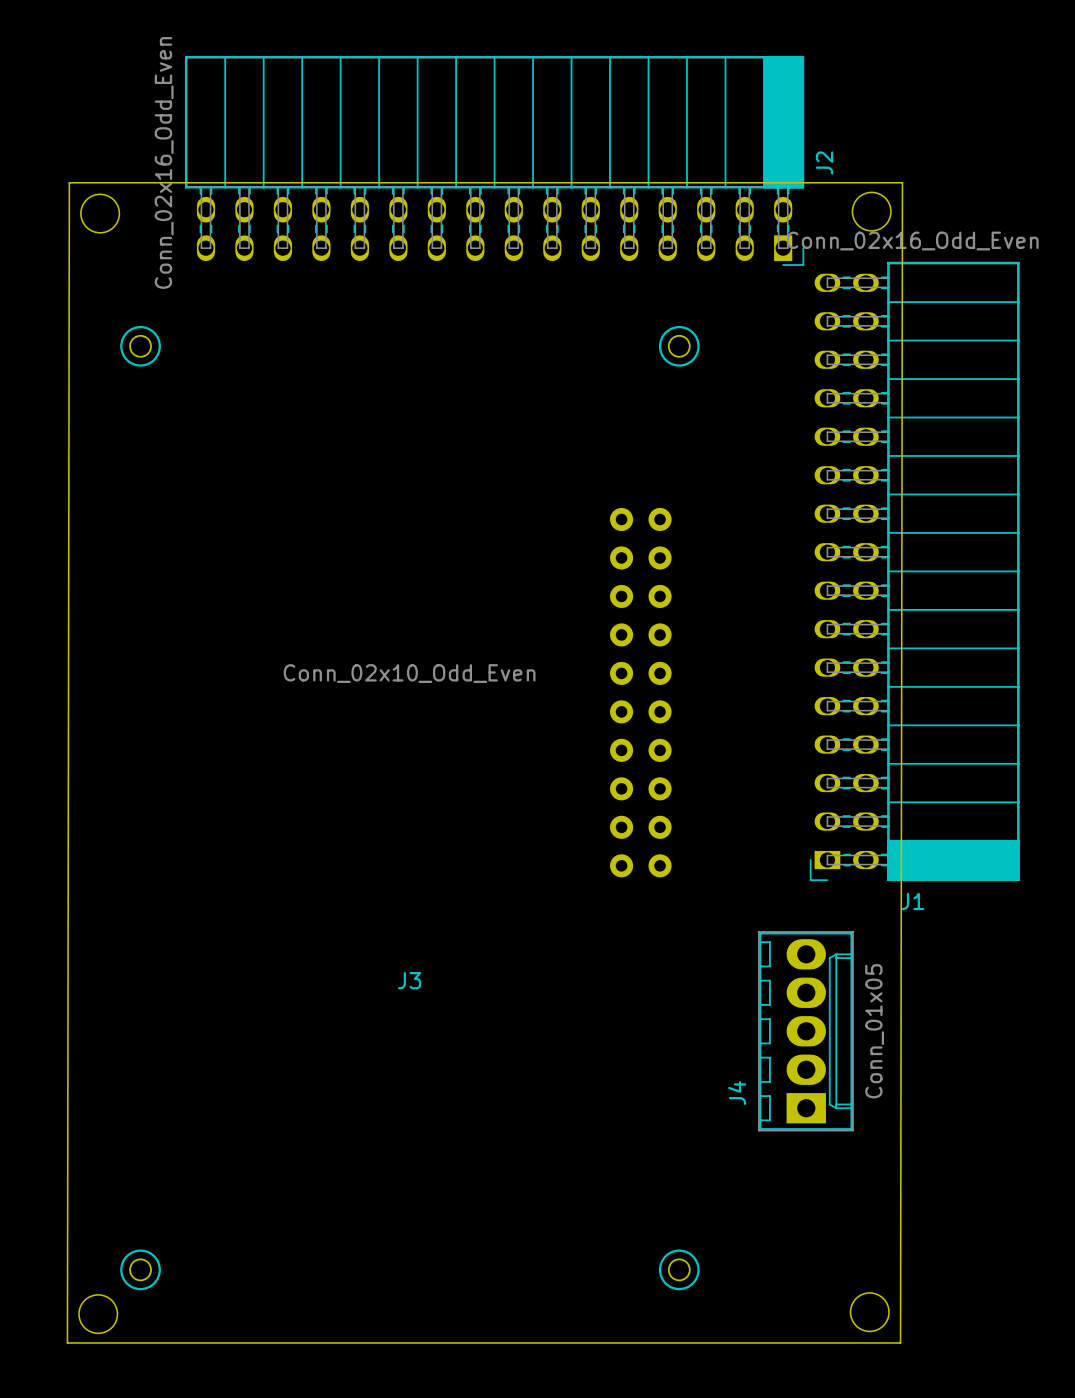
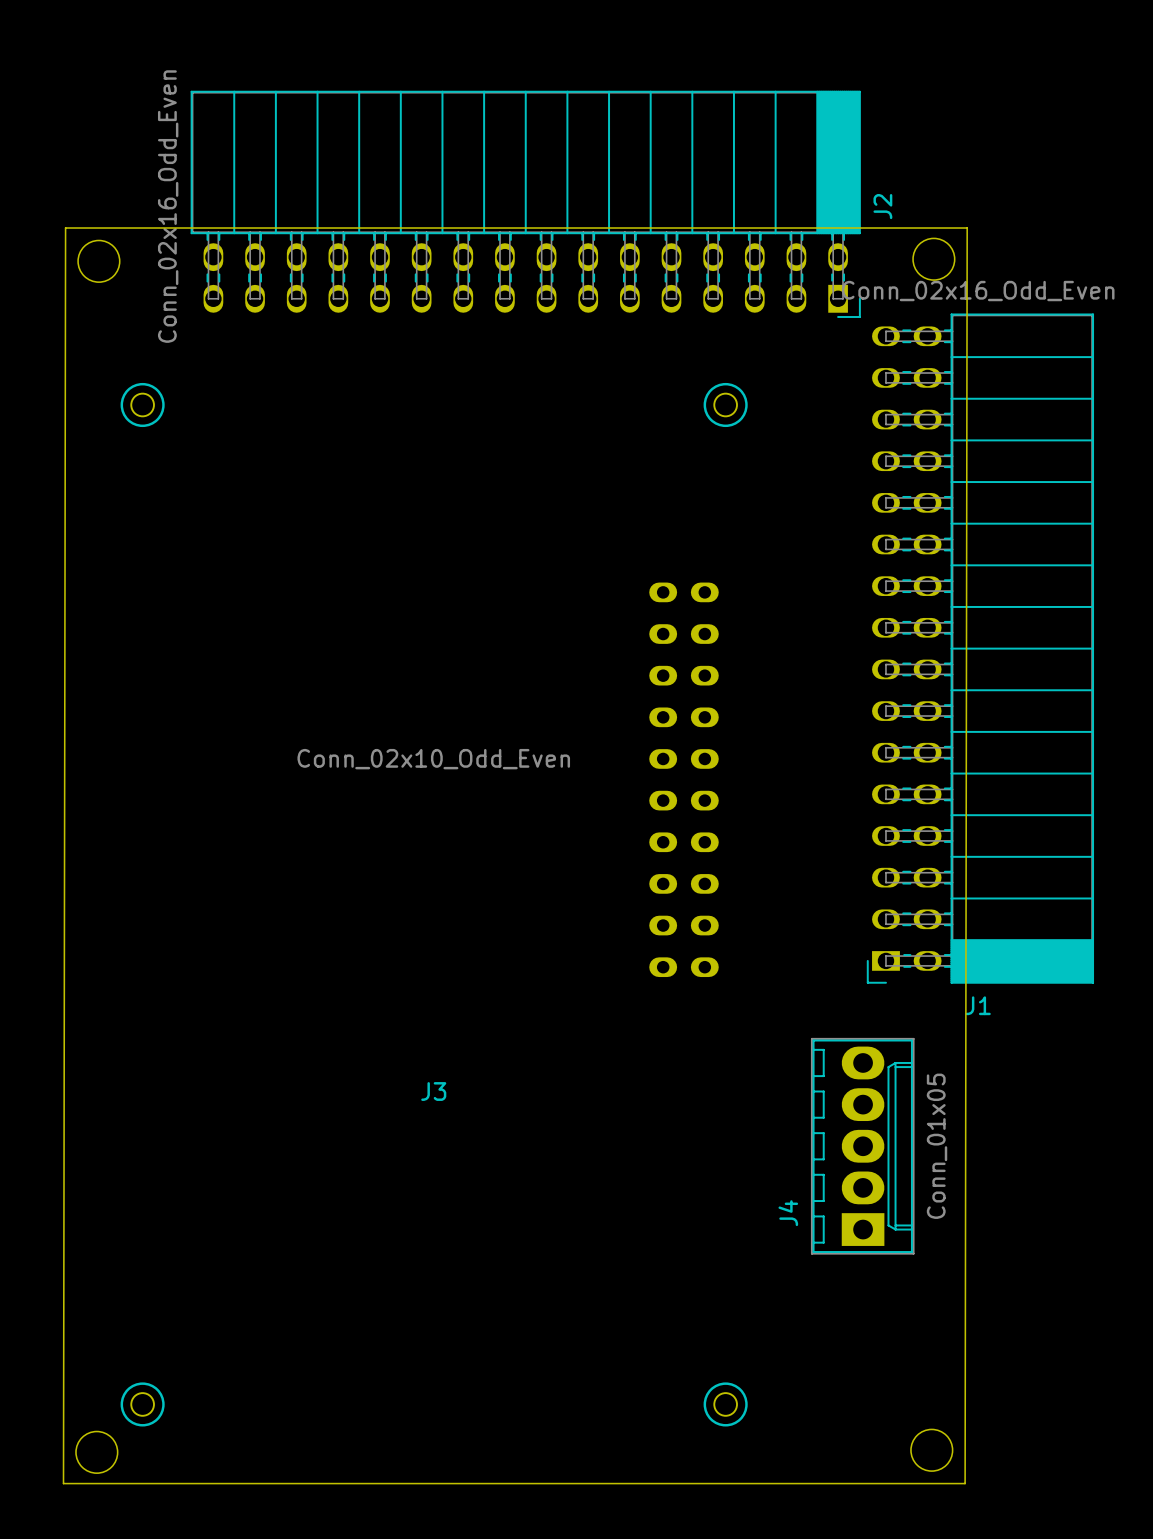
J3 footprint: [120, 325, 700, 1291] -> [120, 382, 748, 1427]

